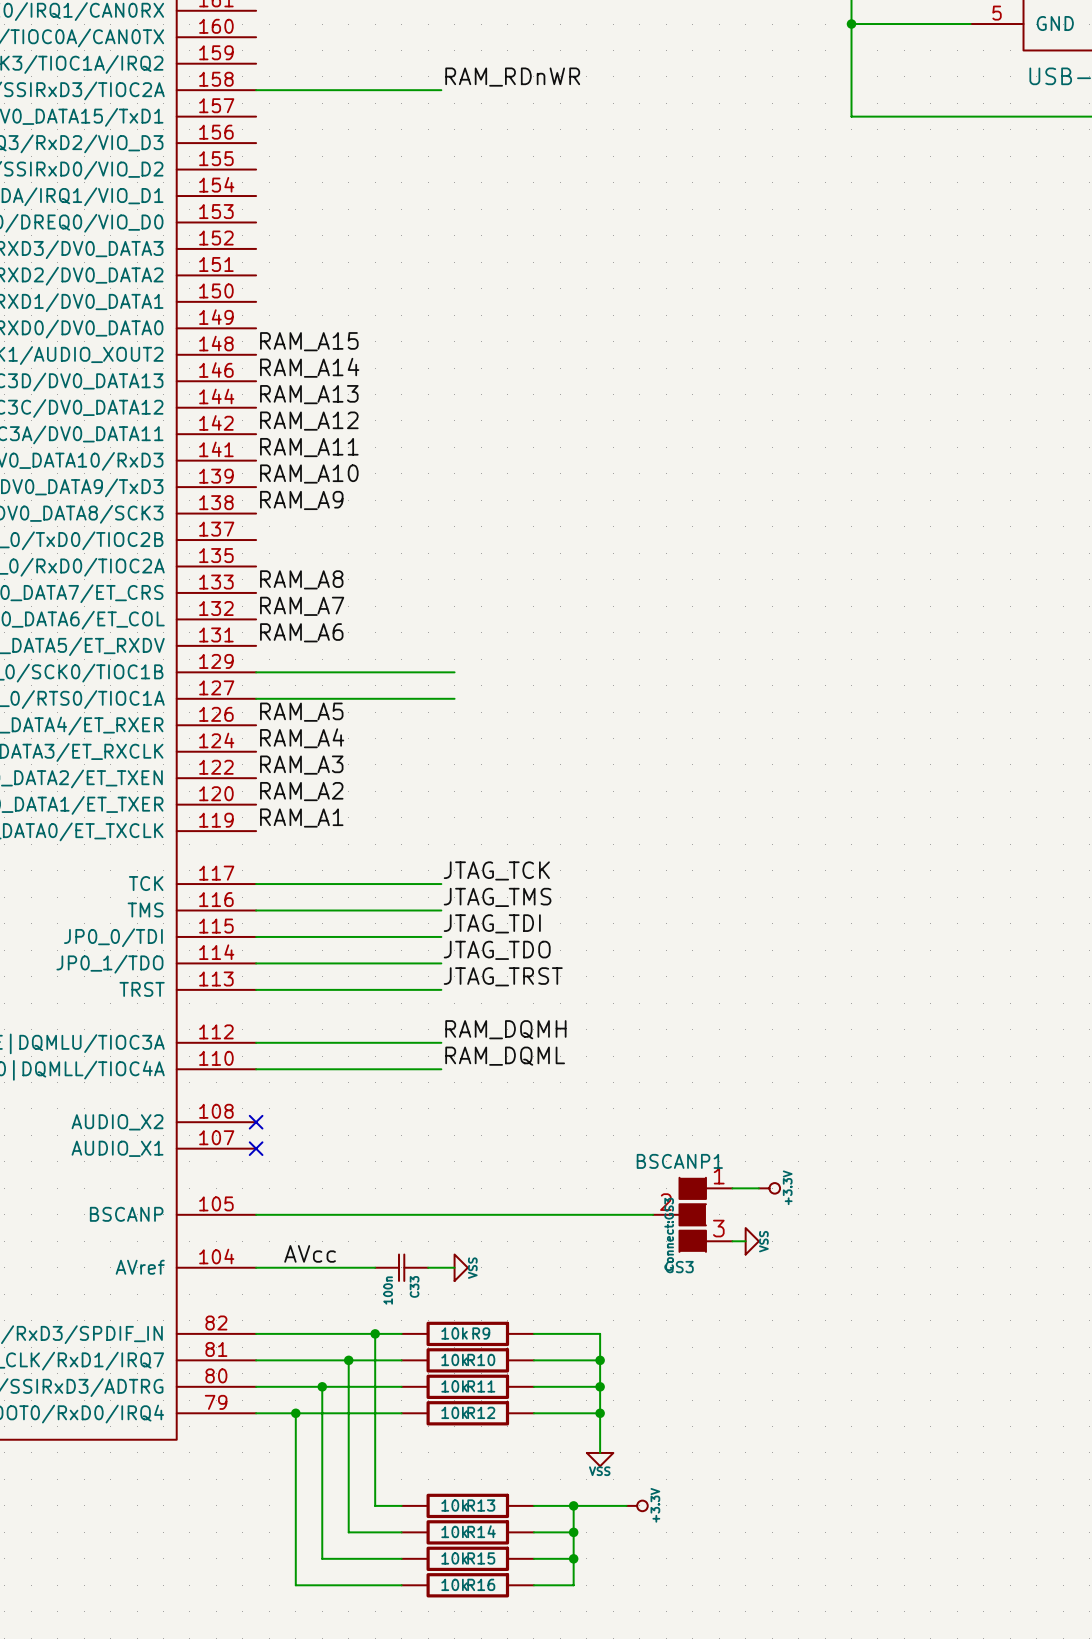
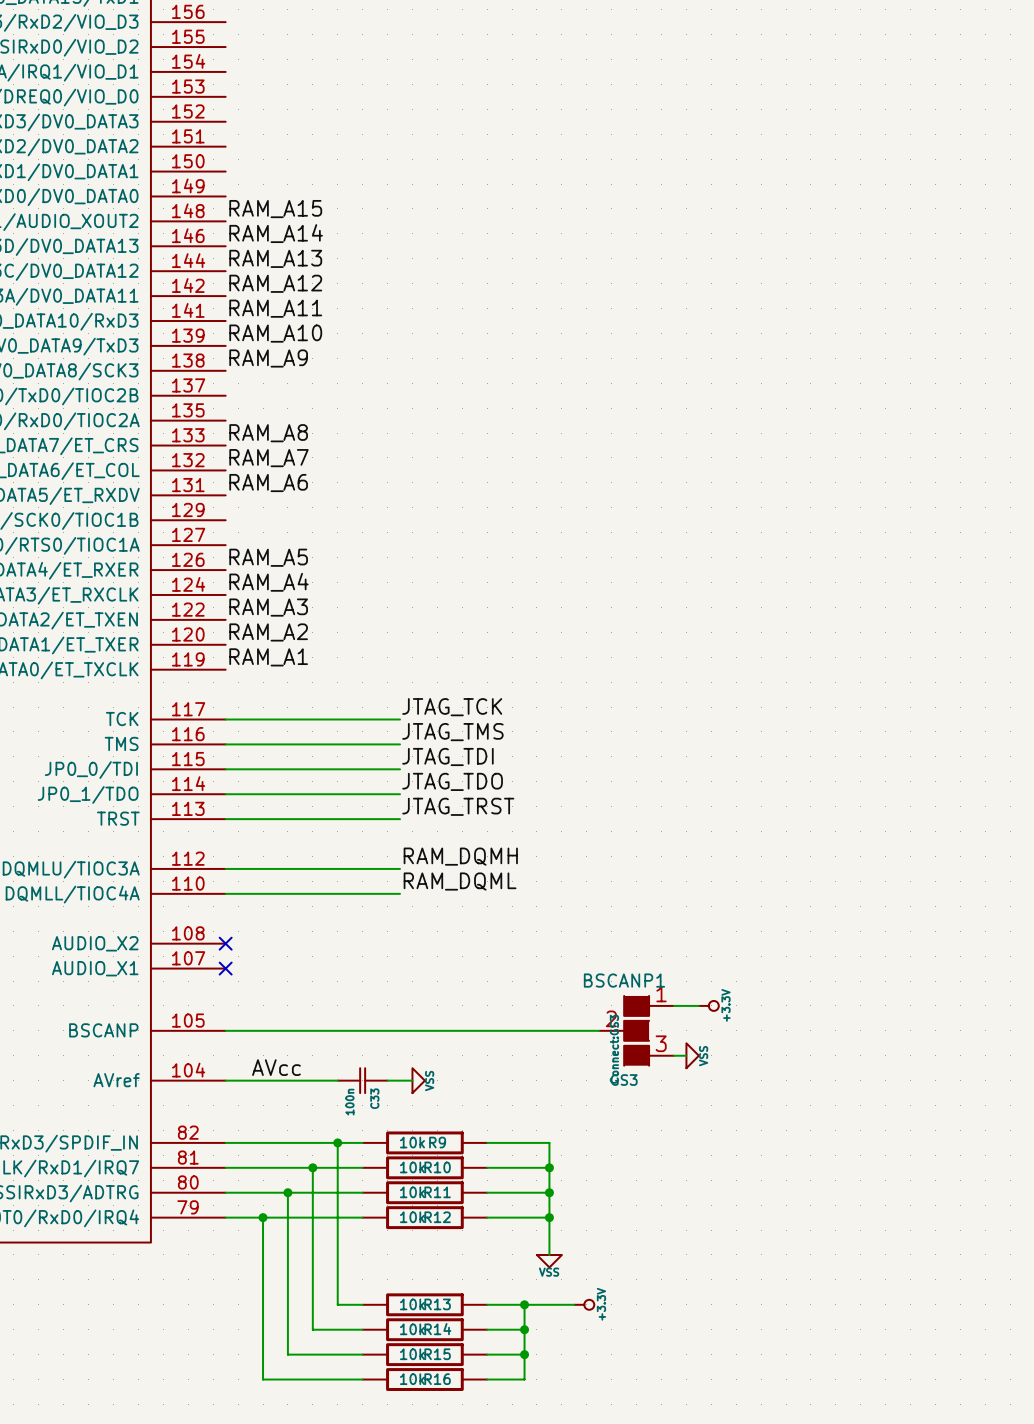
wire: (256, 672) (454, 672) -> none
wire: (256, 698) (454, 698) -> none

